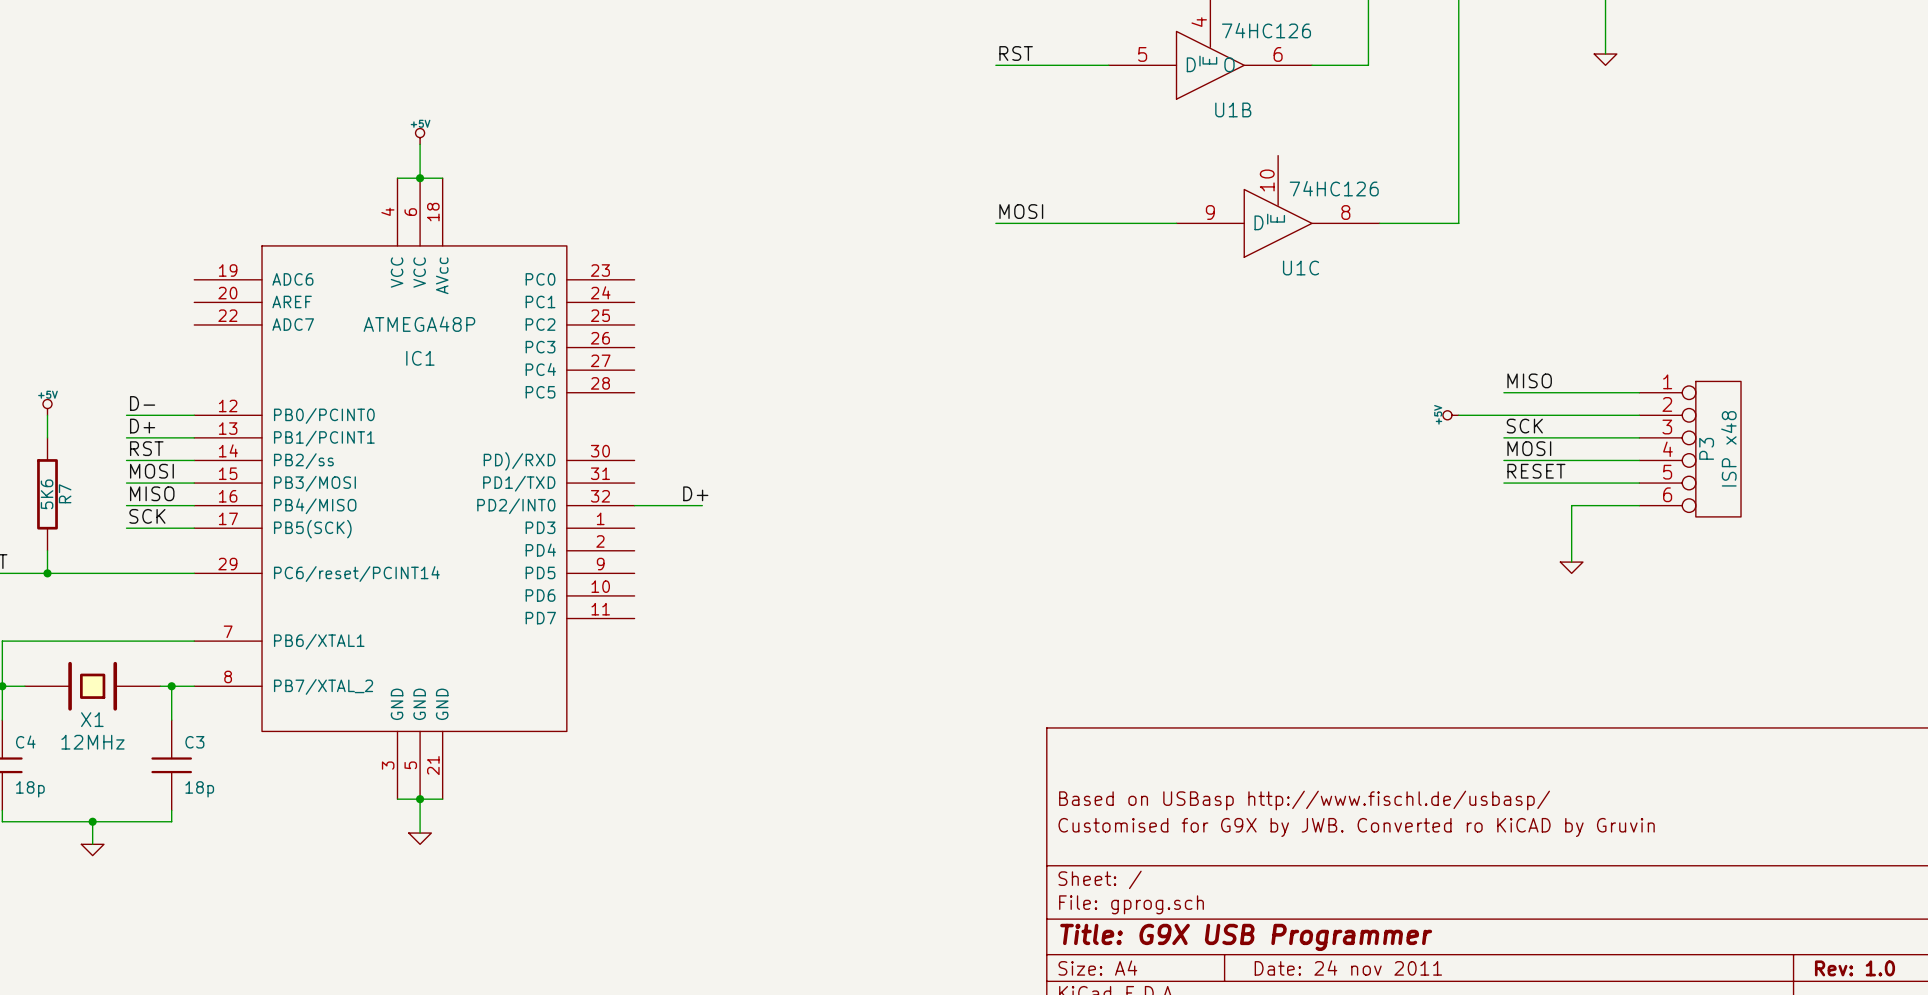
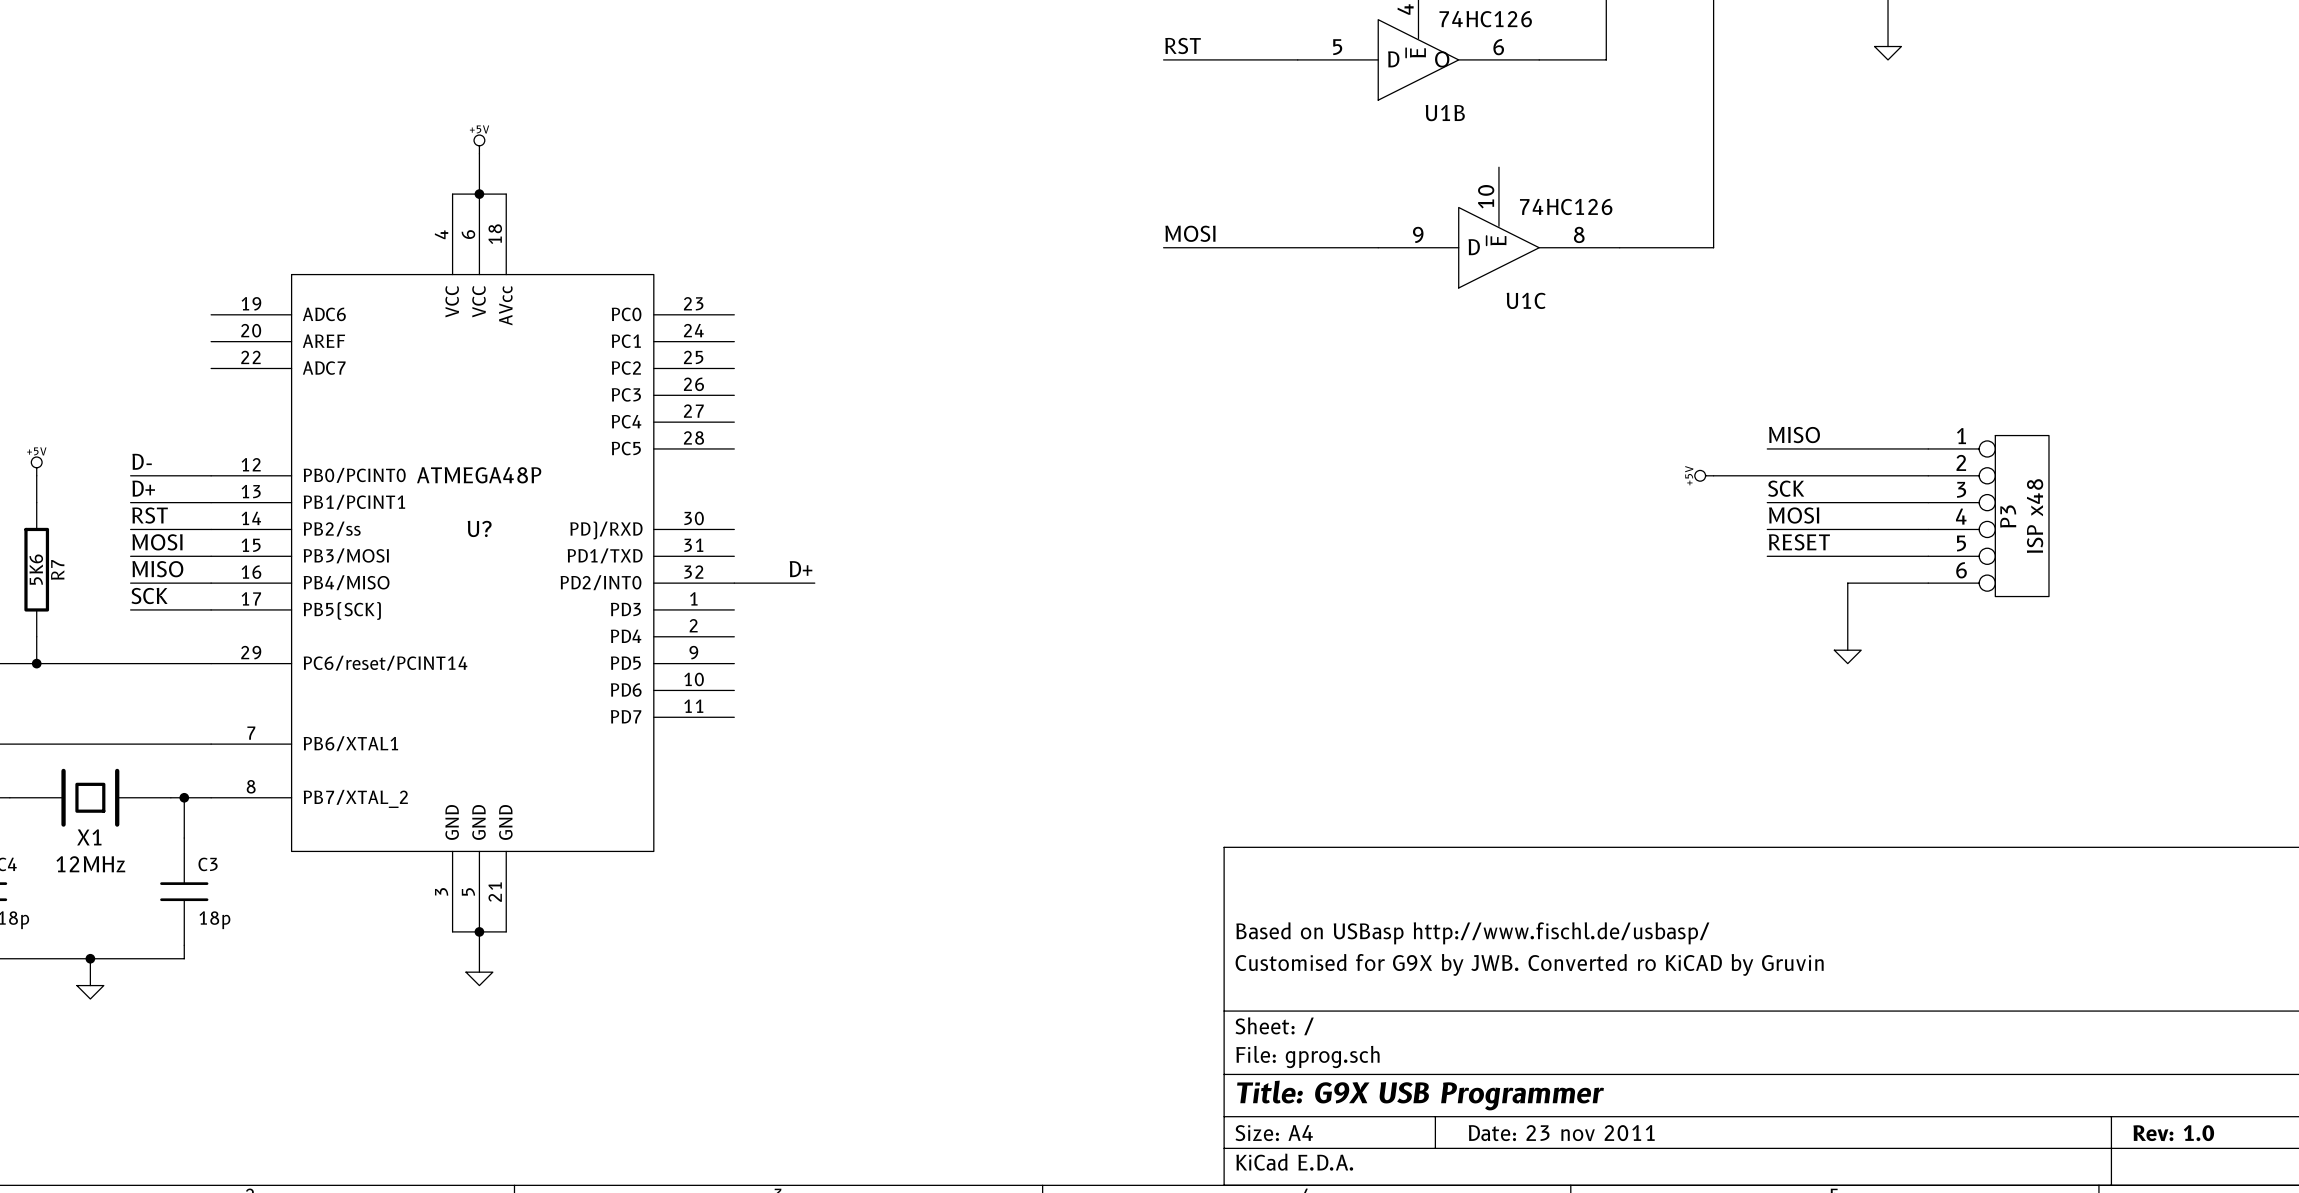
IC1 value position: ATMEGA48P (419, 324) -> ATMEGA48P (479, 475)
IC1 name: IC1 (420, 358) -> U? (479, 528)
title block: Date: 24 nov 2011 (1348, 968) -> Date: 23 nov 2011 (1561, 1133)

